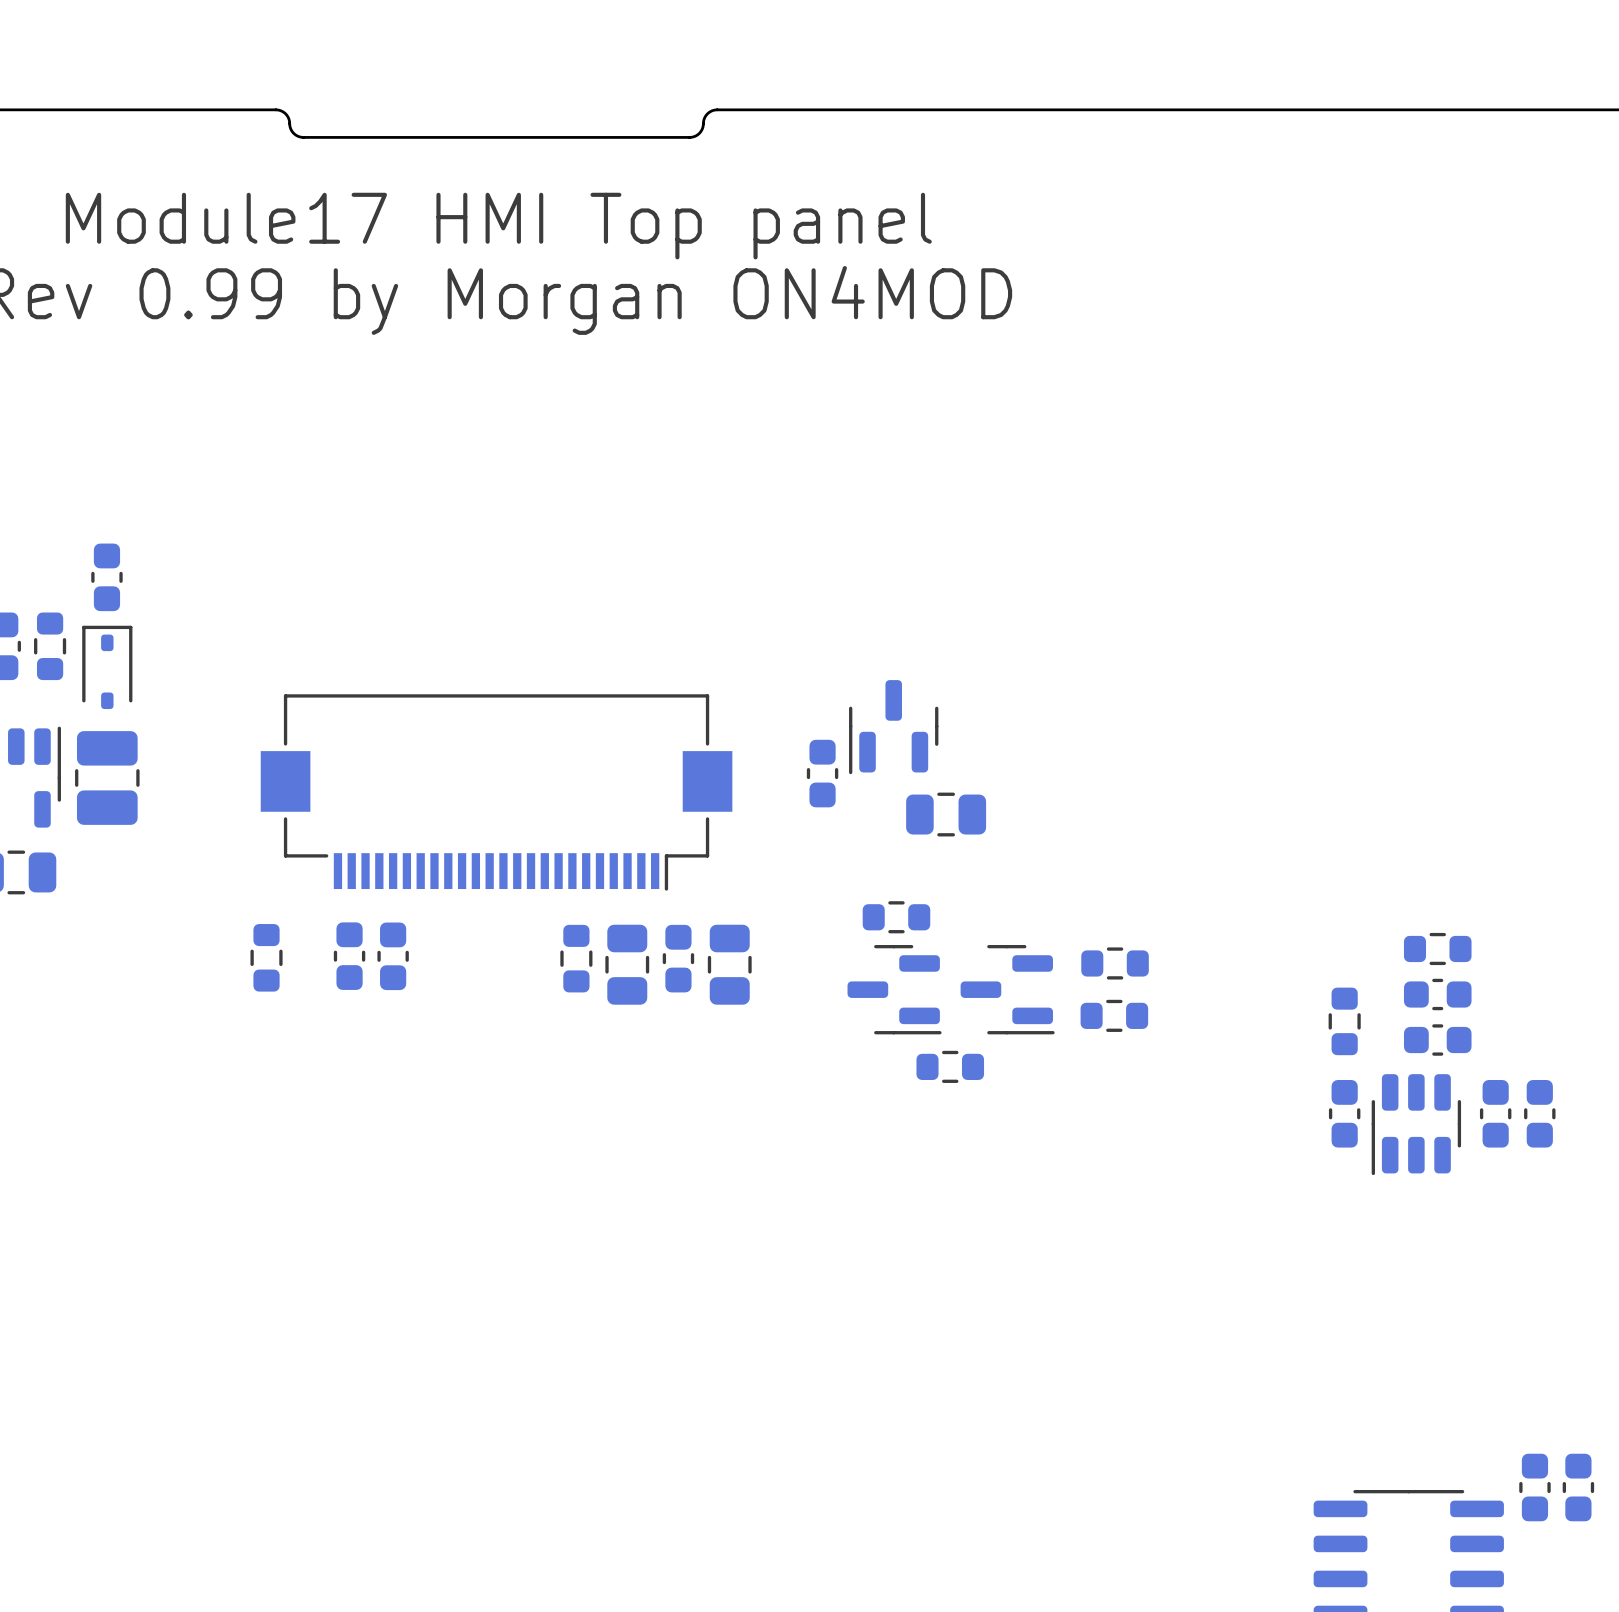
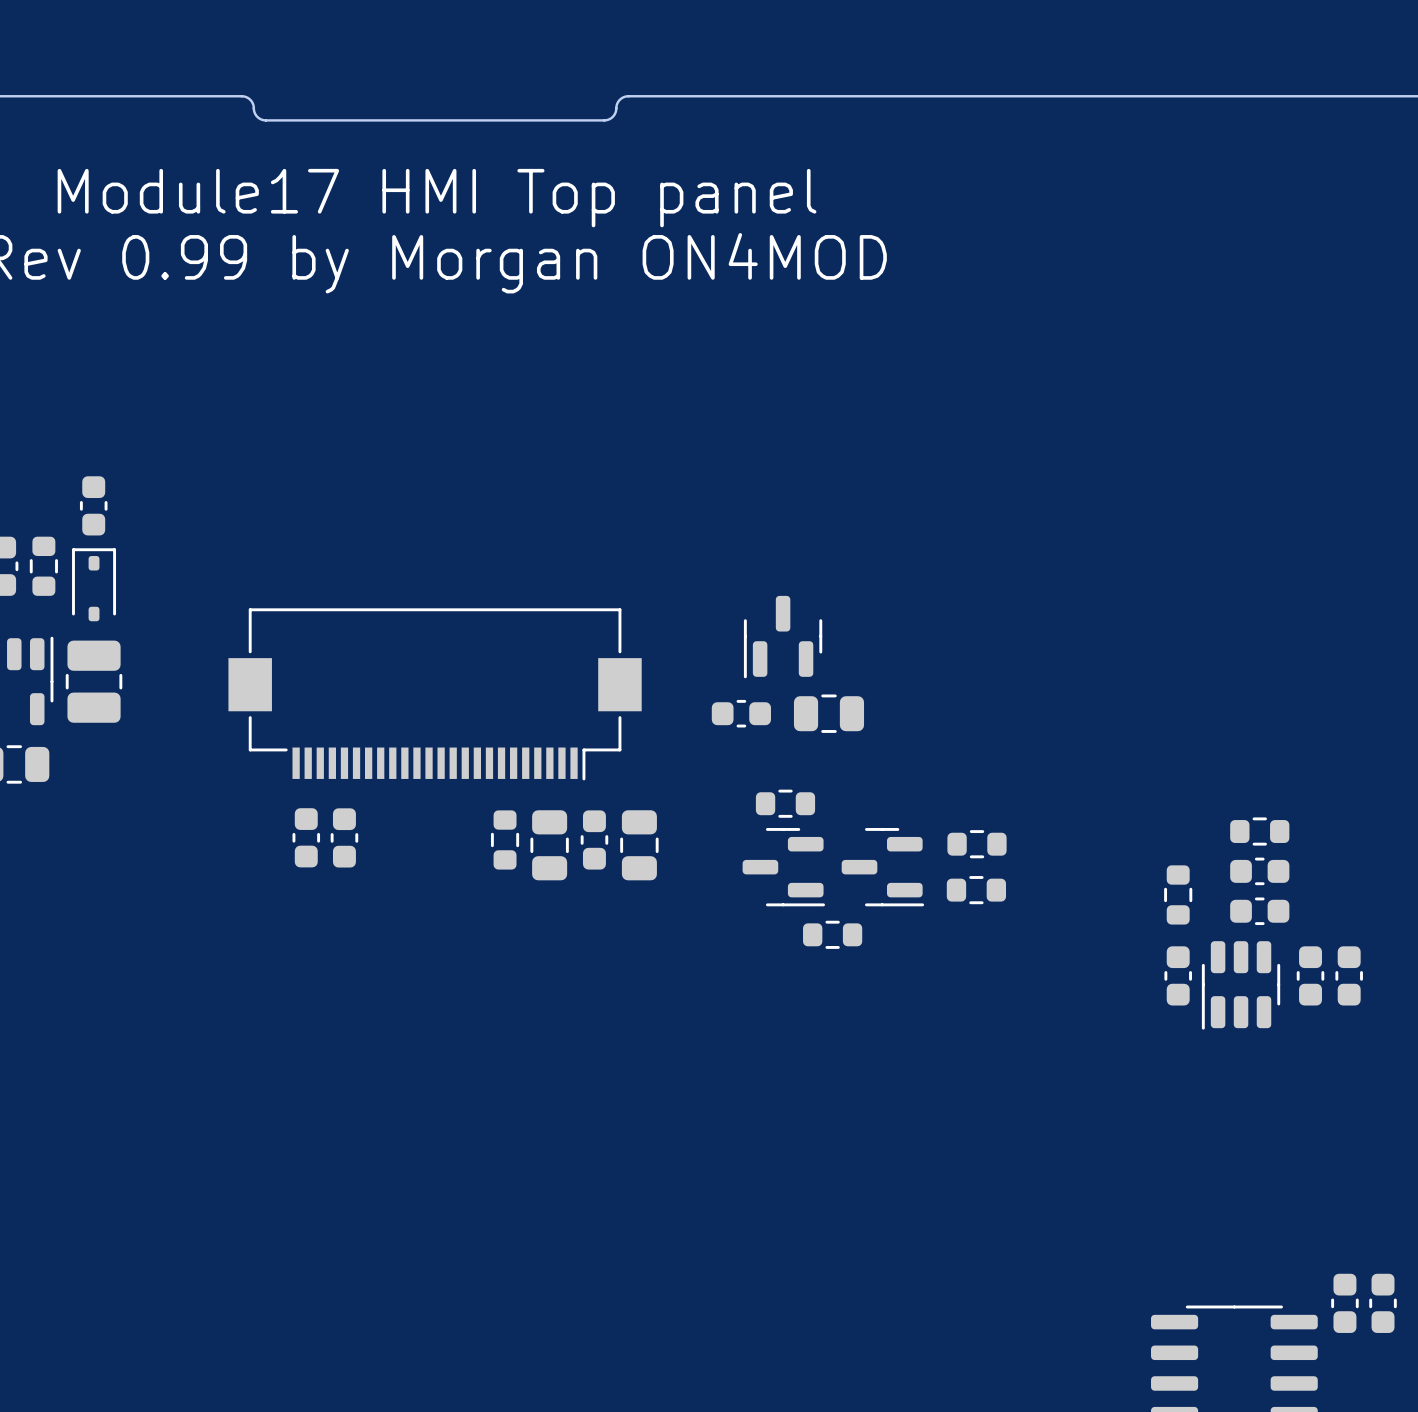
part rotation: 0° (822, 773) -> 90° clockwise (741, 713)
part position: (822, 773) -> (741, 713)
part: (266, 957) -> none

